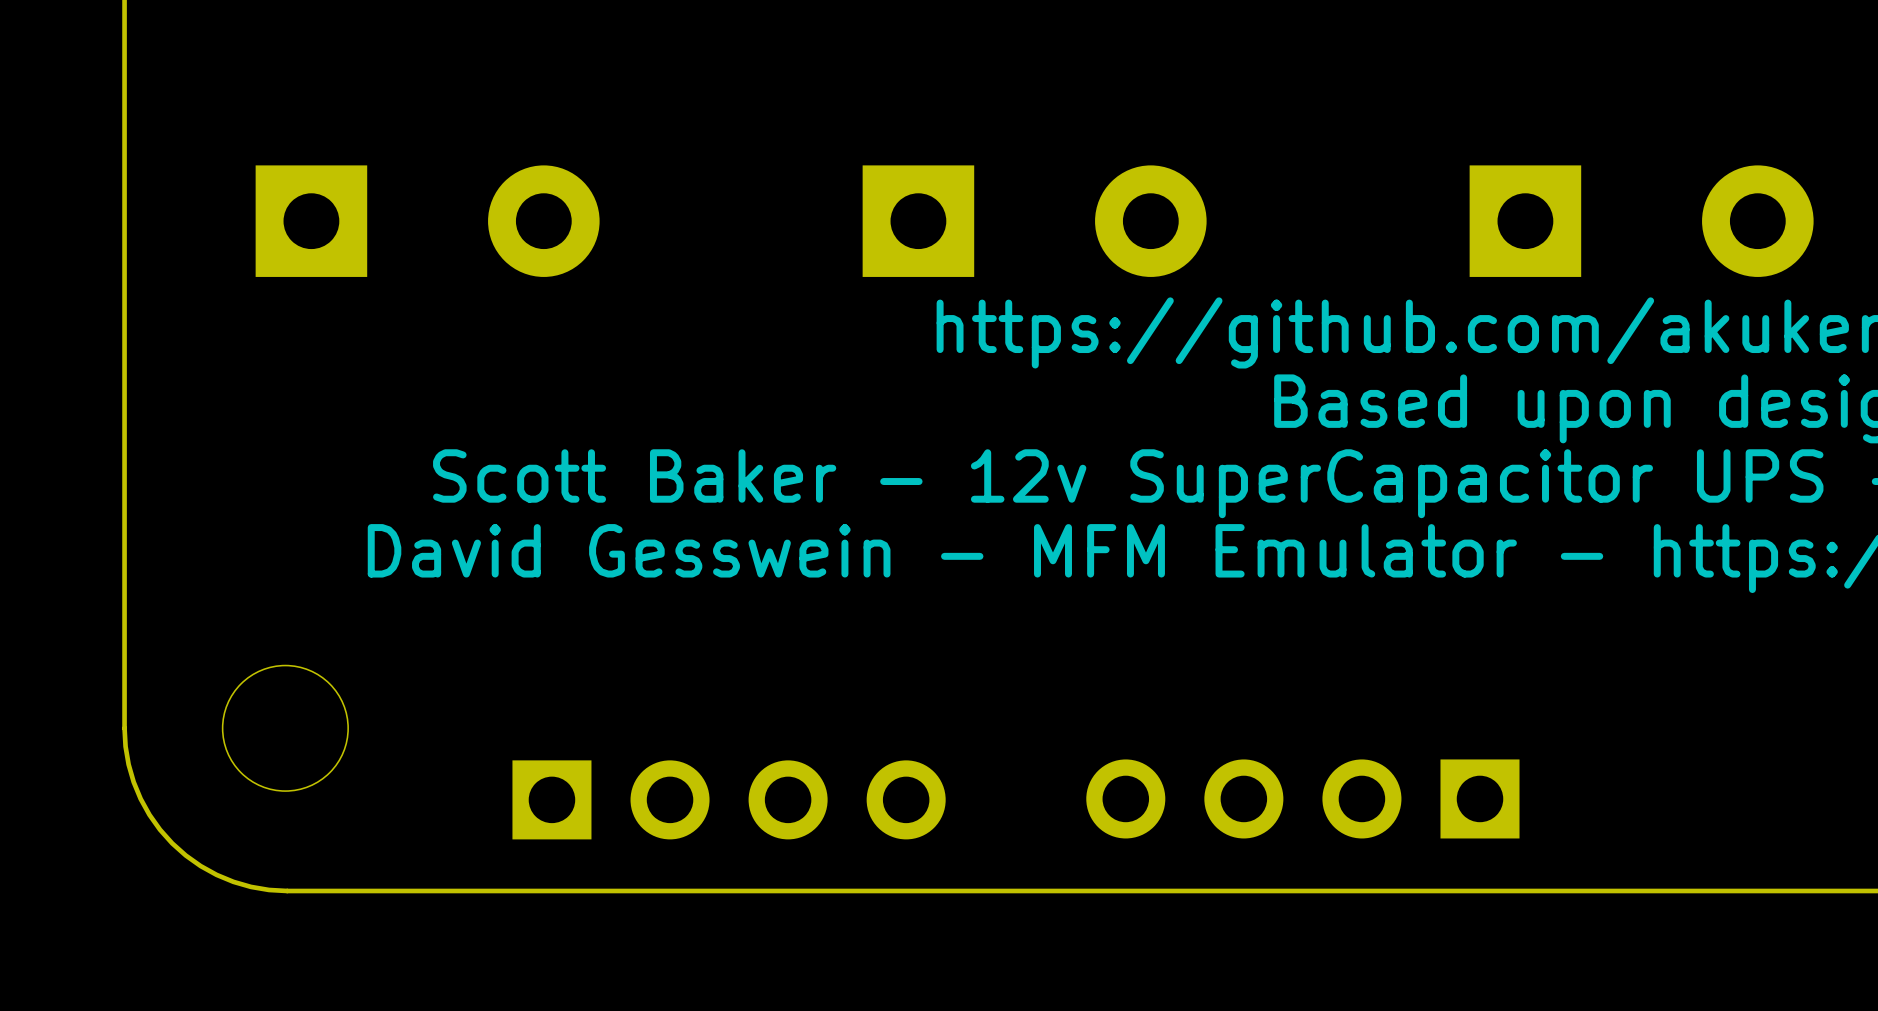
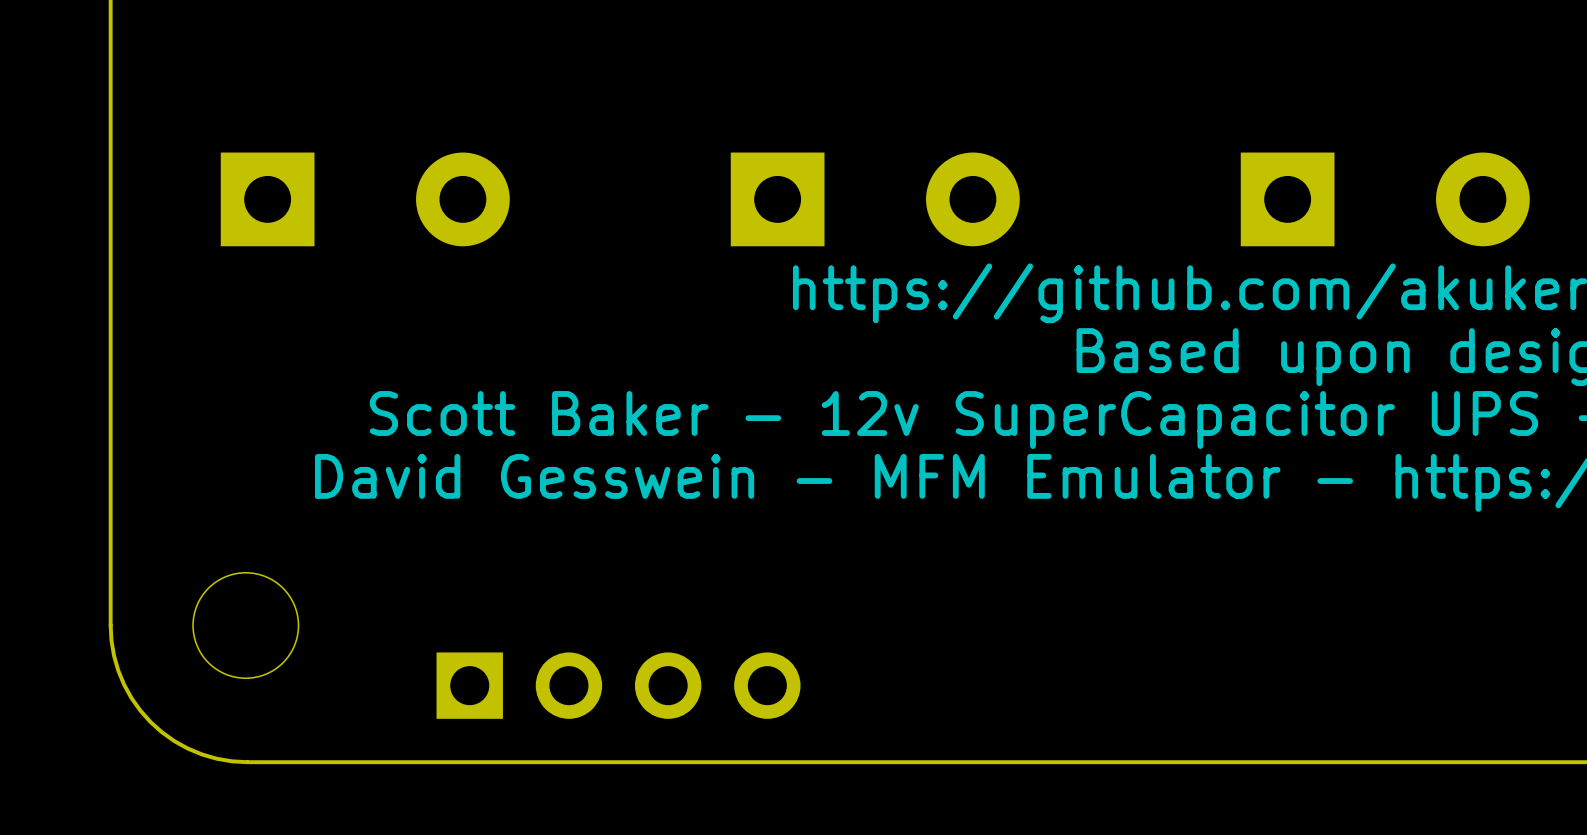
part: (1302, 798) -> none

